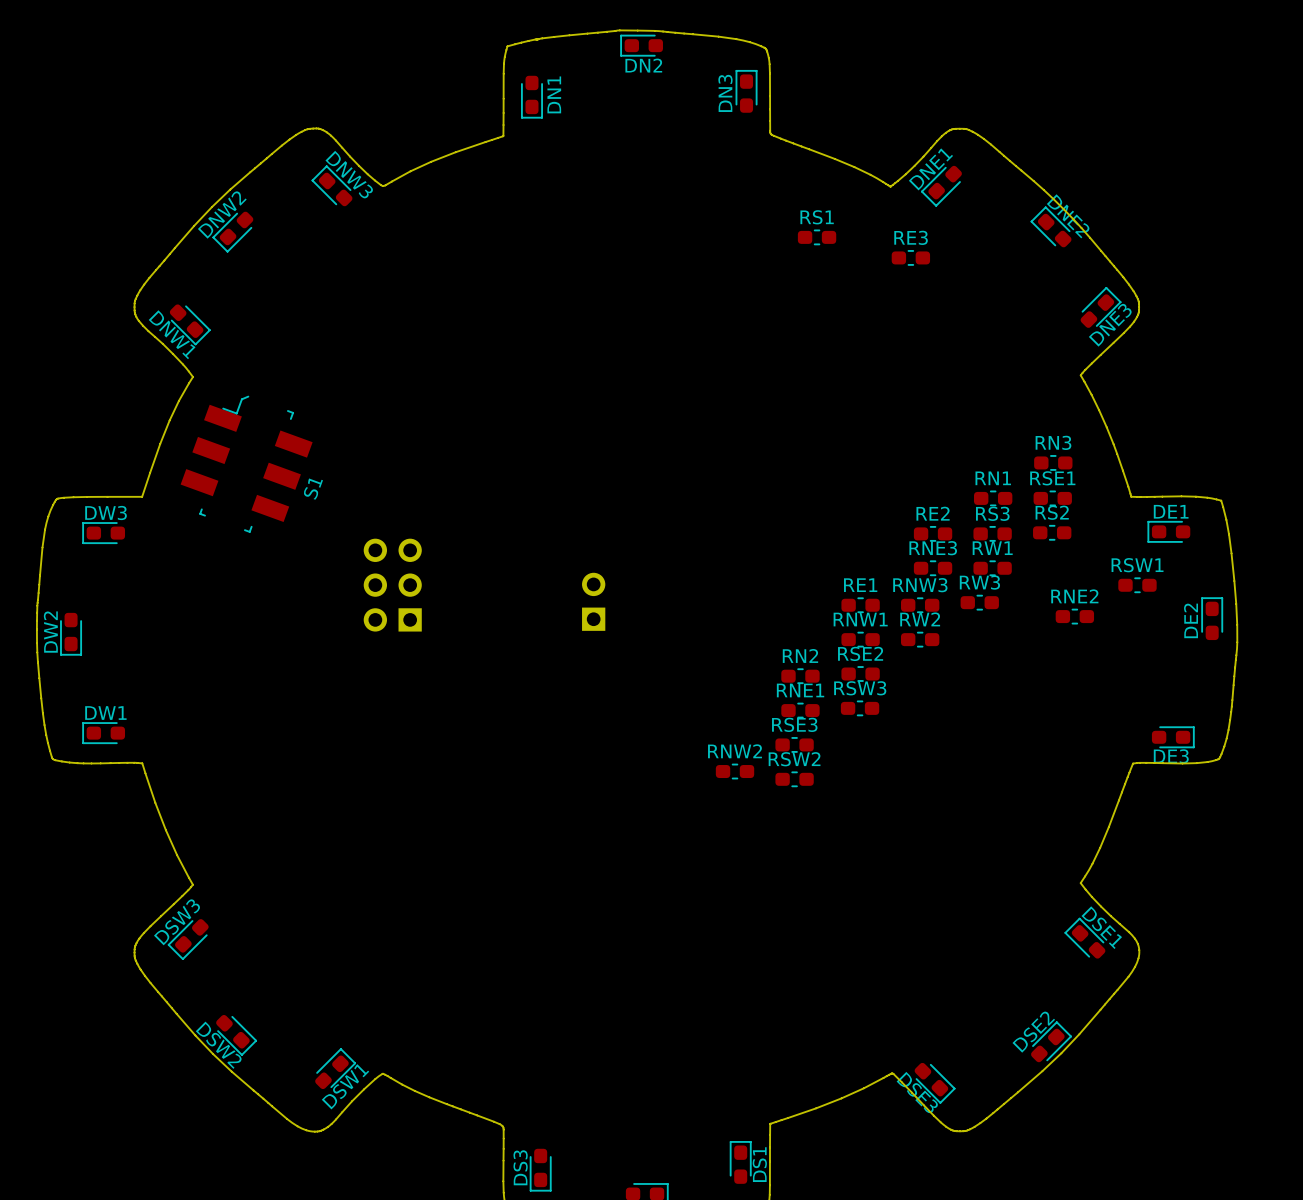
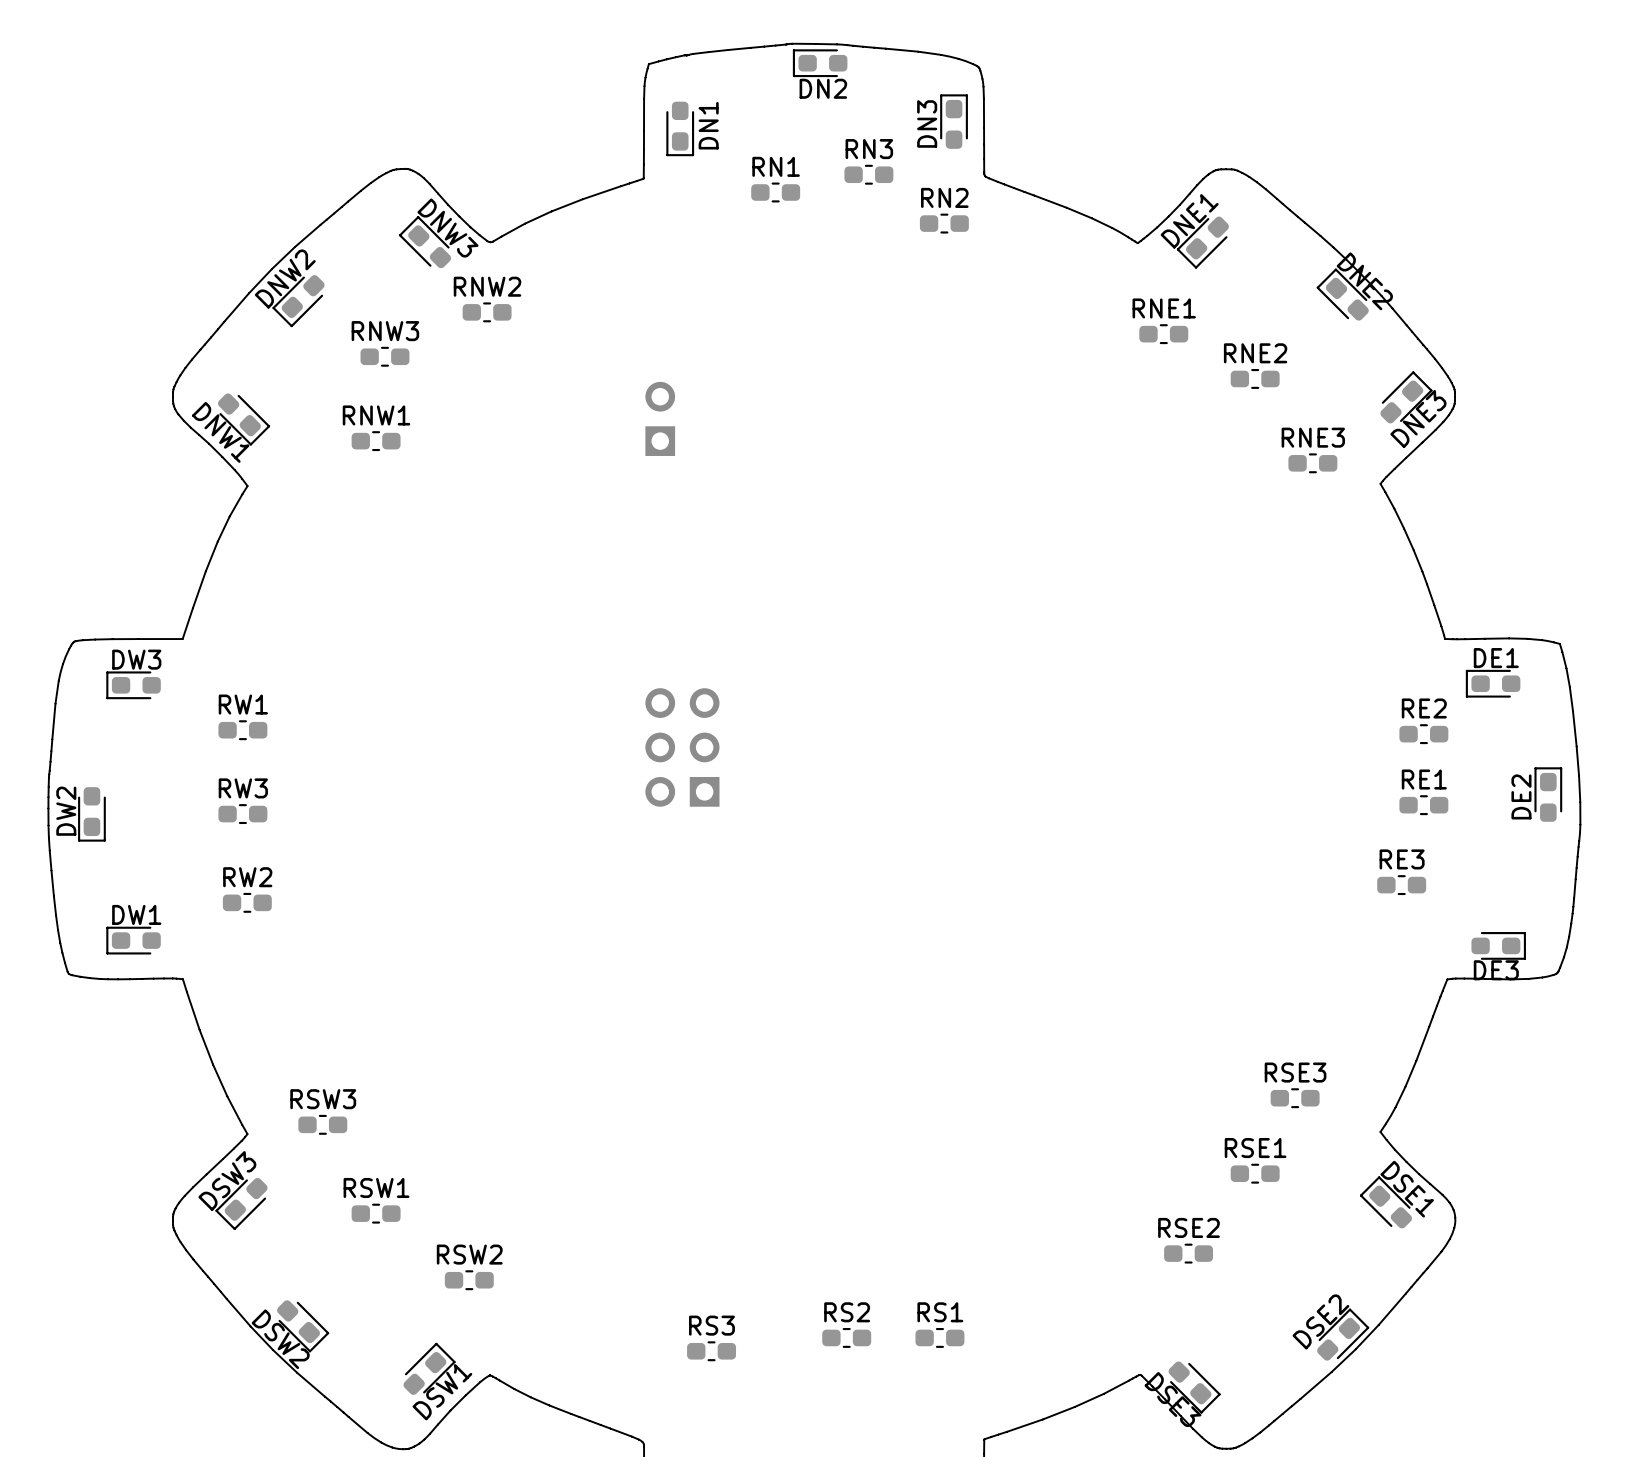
RS1 position: (817, 237) -> (939, 1337)
RE3 name: RE3 (911, 237) -> RNE1 (1164, 308)
RN3 position: (1053, 462) -> (868, 174)
S1: (246, 464) -> none
RN1 position: (993, 498) -> (775, 192)
RSE1 position: (1052, 498) -> (1255, 1173)
RS2 position: (1052, 532) -> (846, 1337)
RE2 position: (933, 533) -> (1423, 734)
RS3 position: (992, 533) -> (711, 1351)
RNE3 position: (933, 568) -> (1312, 463)
RW1 position: (992, 568) -> (242, 730)
part position: (392, 585) -> (682, 747)
RSW1 position: (1137, 585) -> (376, 1213)
part position: (593, 601) -> (660, 418)
RW3 position: (979, 602) -> (242, 814)
RE1 position: (860, 605) -> (1423, 805)
RNW3 position: (920, 605) -> (384, 356)
RNE2 position: (1074, 616) -> (1255, 378)
RNW1 position: (860, 639) -> (376, 441)
RW2 position: (920, 639) -> (247, 902)
RSE2 position: (860, 674) -> (1188, 1253)
RN2 position: (800, 676) -> (944, 223)
RE3: none -> (1401, 885)
RSW3 position: (860, 708) -> (322, 1124)
RNE1: (800, 710) -> none
RSE3 position: (794, 744) -> (1295, 1098)
RNW2 position: (735, 771) -> (487, 312)
RSW2 position: (794, 779) -> (469, 1280)

